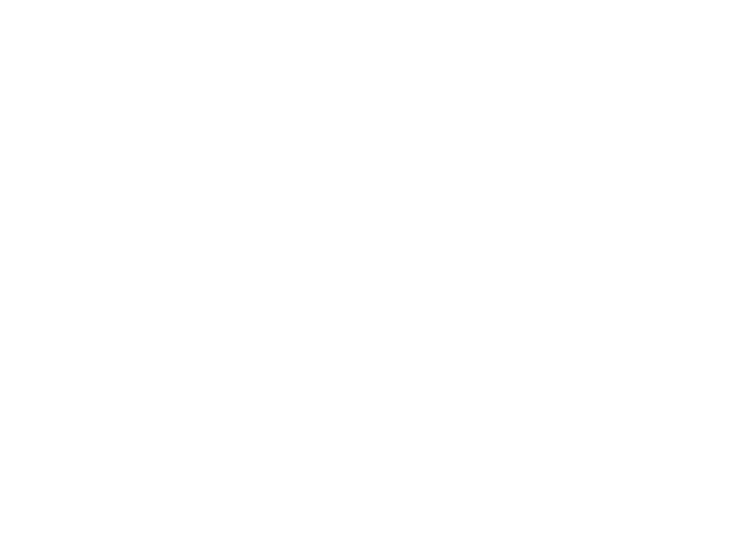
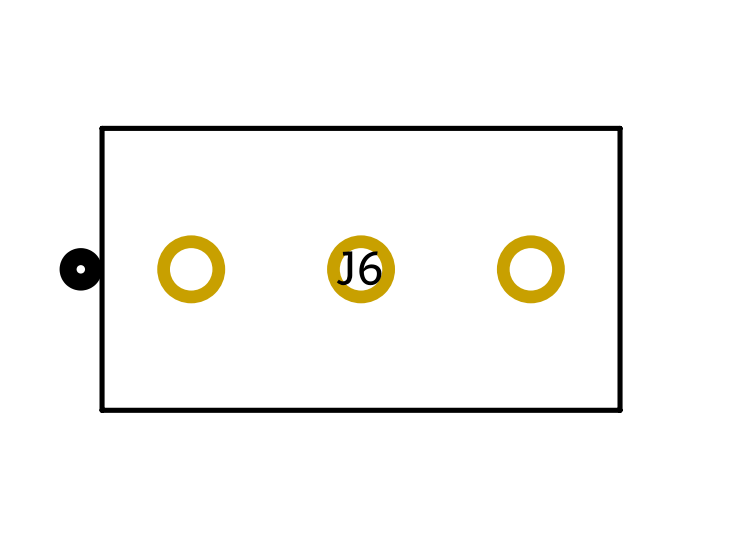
J6: none -> (341, 269)

